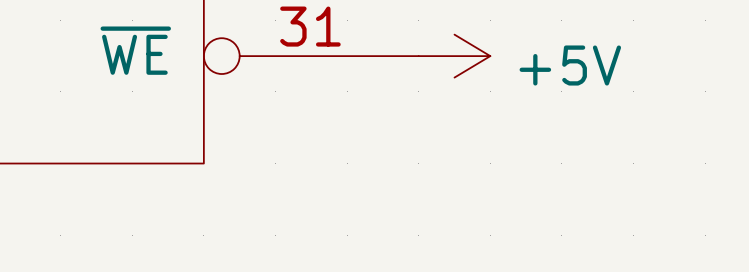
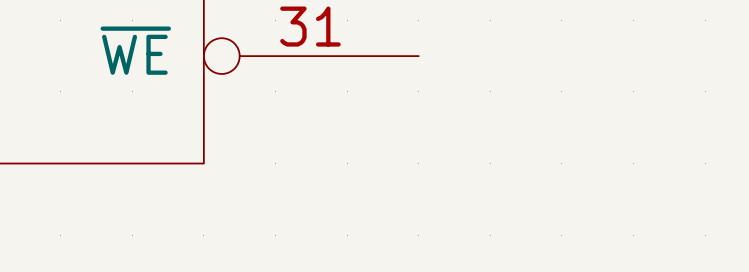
power symbol: +5V (454, 56) -> none

